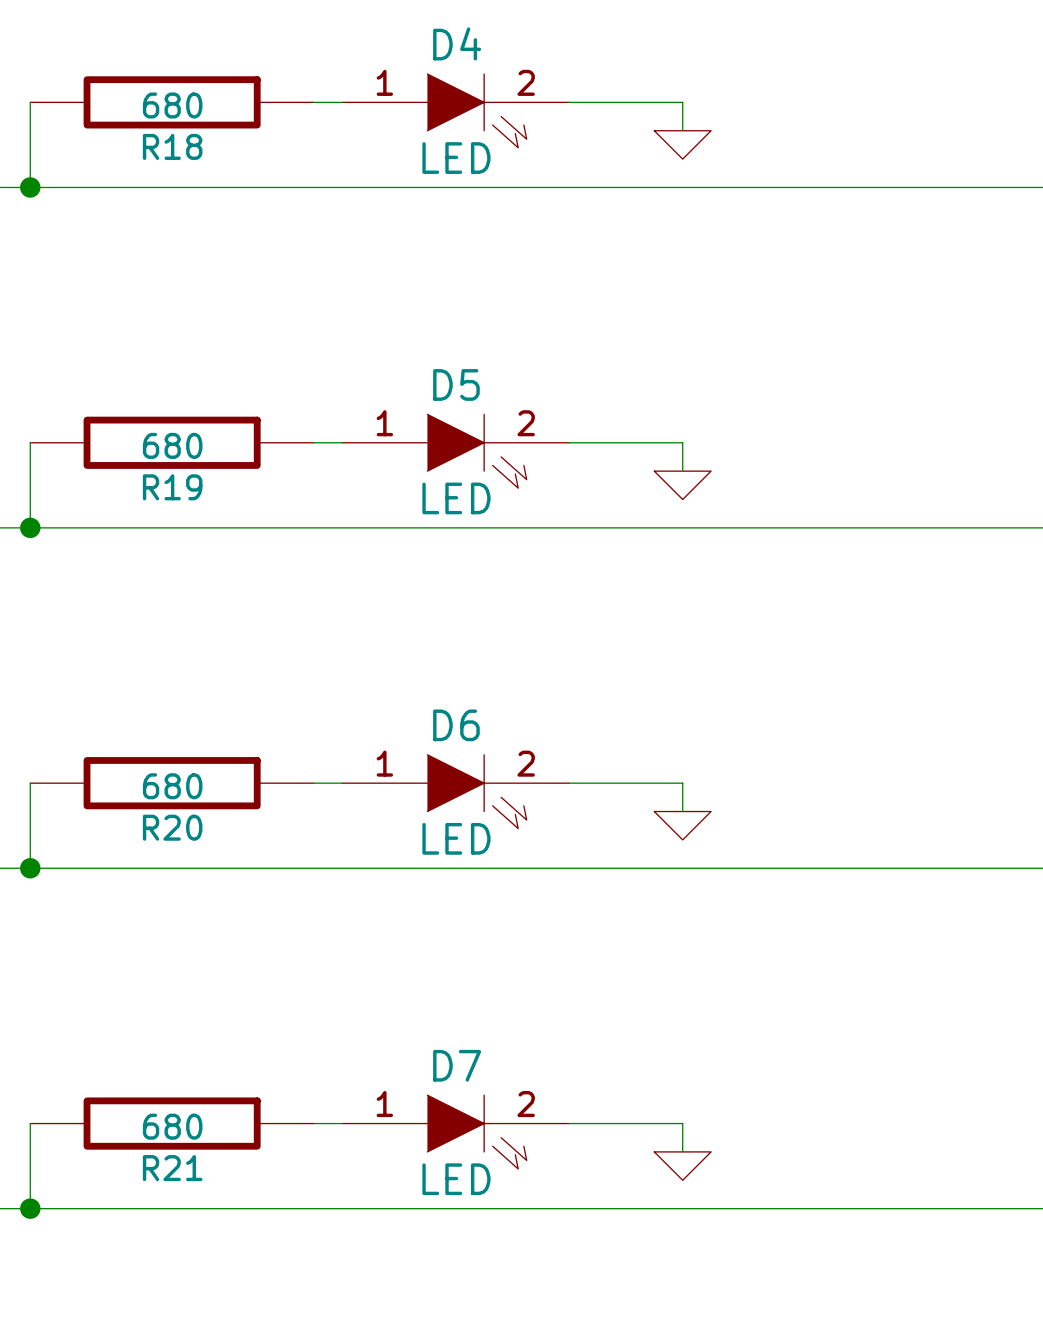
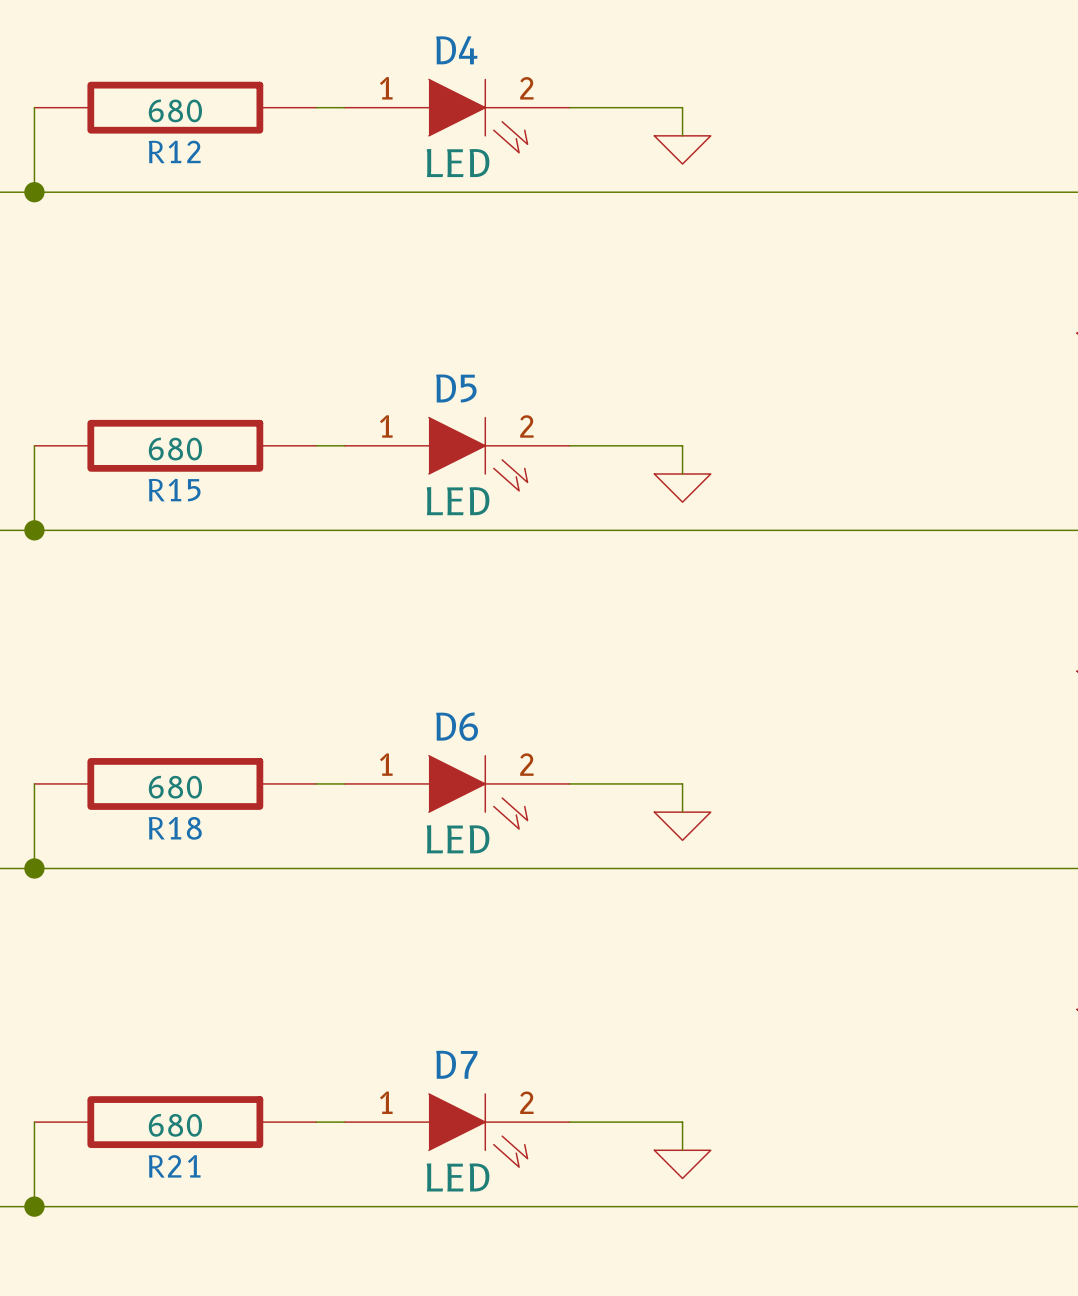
R18 name: R18 (172, 146) -> R12 (174, 151)
R19 name: R19 (172, 487) -> R15 (174, 490)
R20 name: R20 (172, 827) -> R18 (175, 828)

